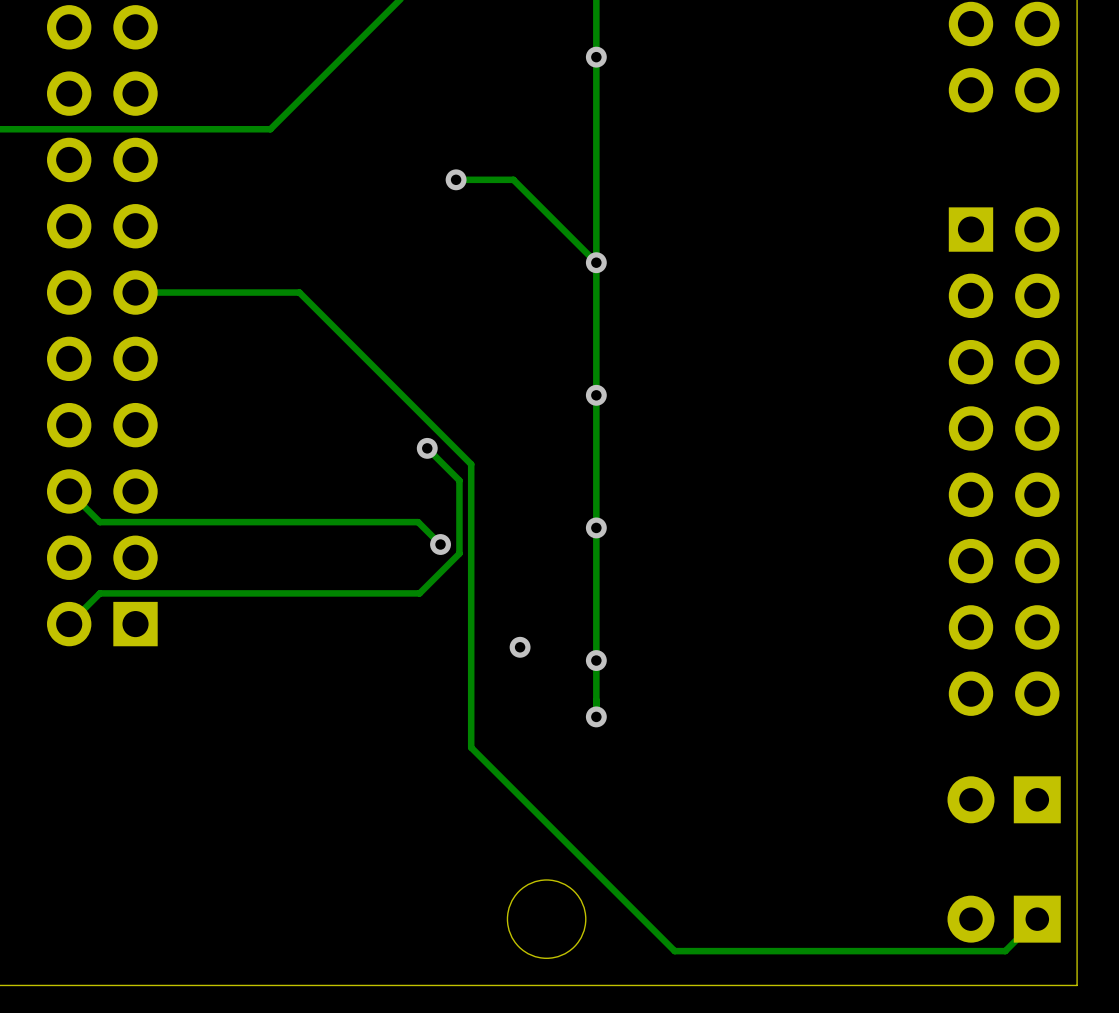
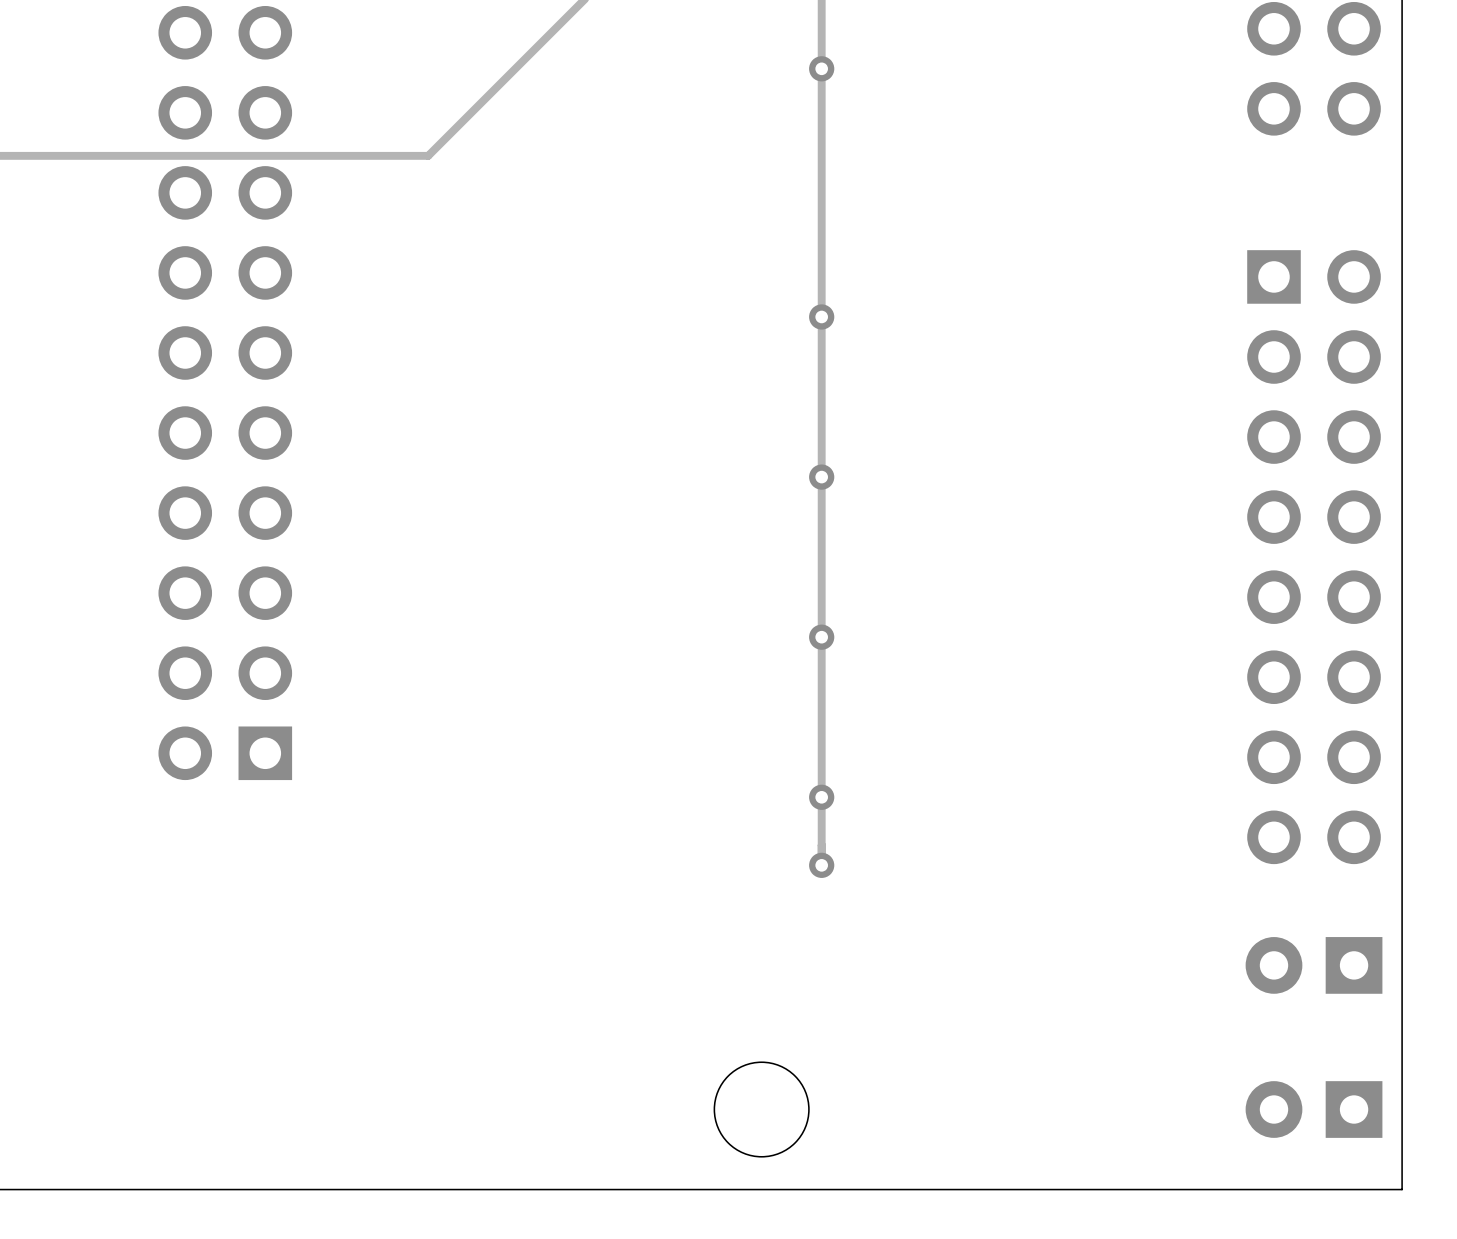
track: (456, 179) (513, 179) (596, 262) -> none
via: (456, 179) -> none
track: (135, 292) (299, 292) (471, 464) (471, 747) (674, 951) (1005, 951) (1037, 919) -> none
track: (427, 448) (459, 480) (459, 553) (419, 593) (99, 593) (69, 624) -> none
via: (427, 448) -> none
track: (69, 491) (99, 522) (418, 522) (440, 544) -> none
via: (440, 544) -> none
via: (520, 647) -> none

